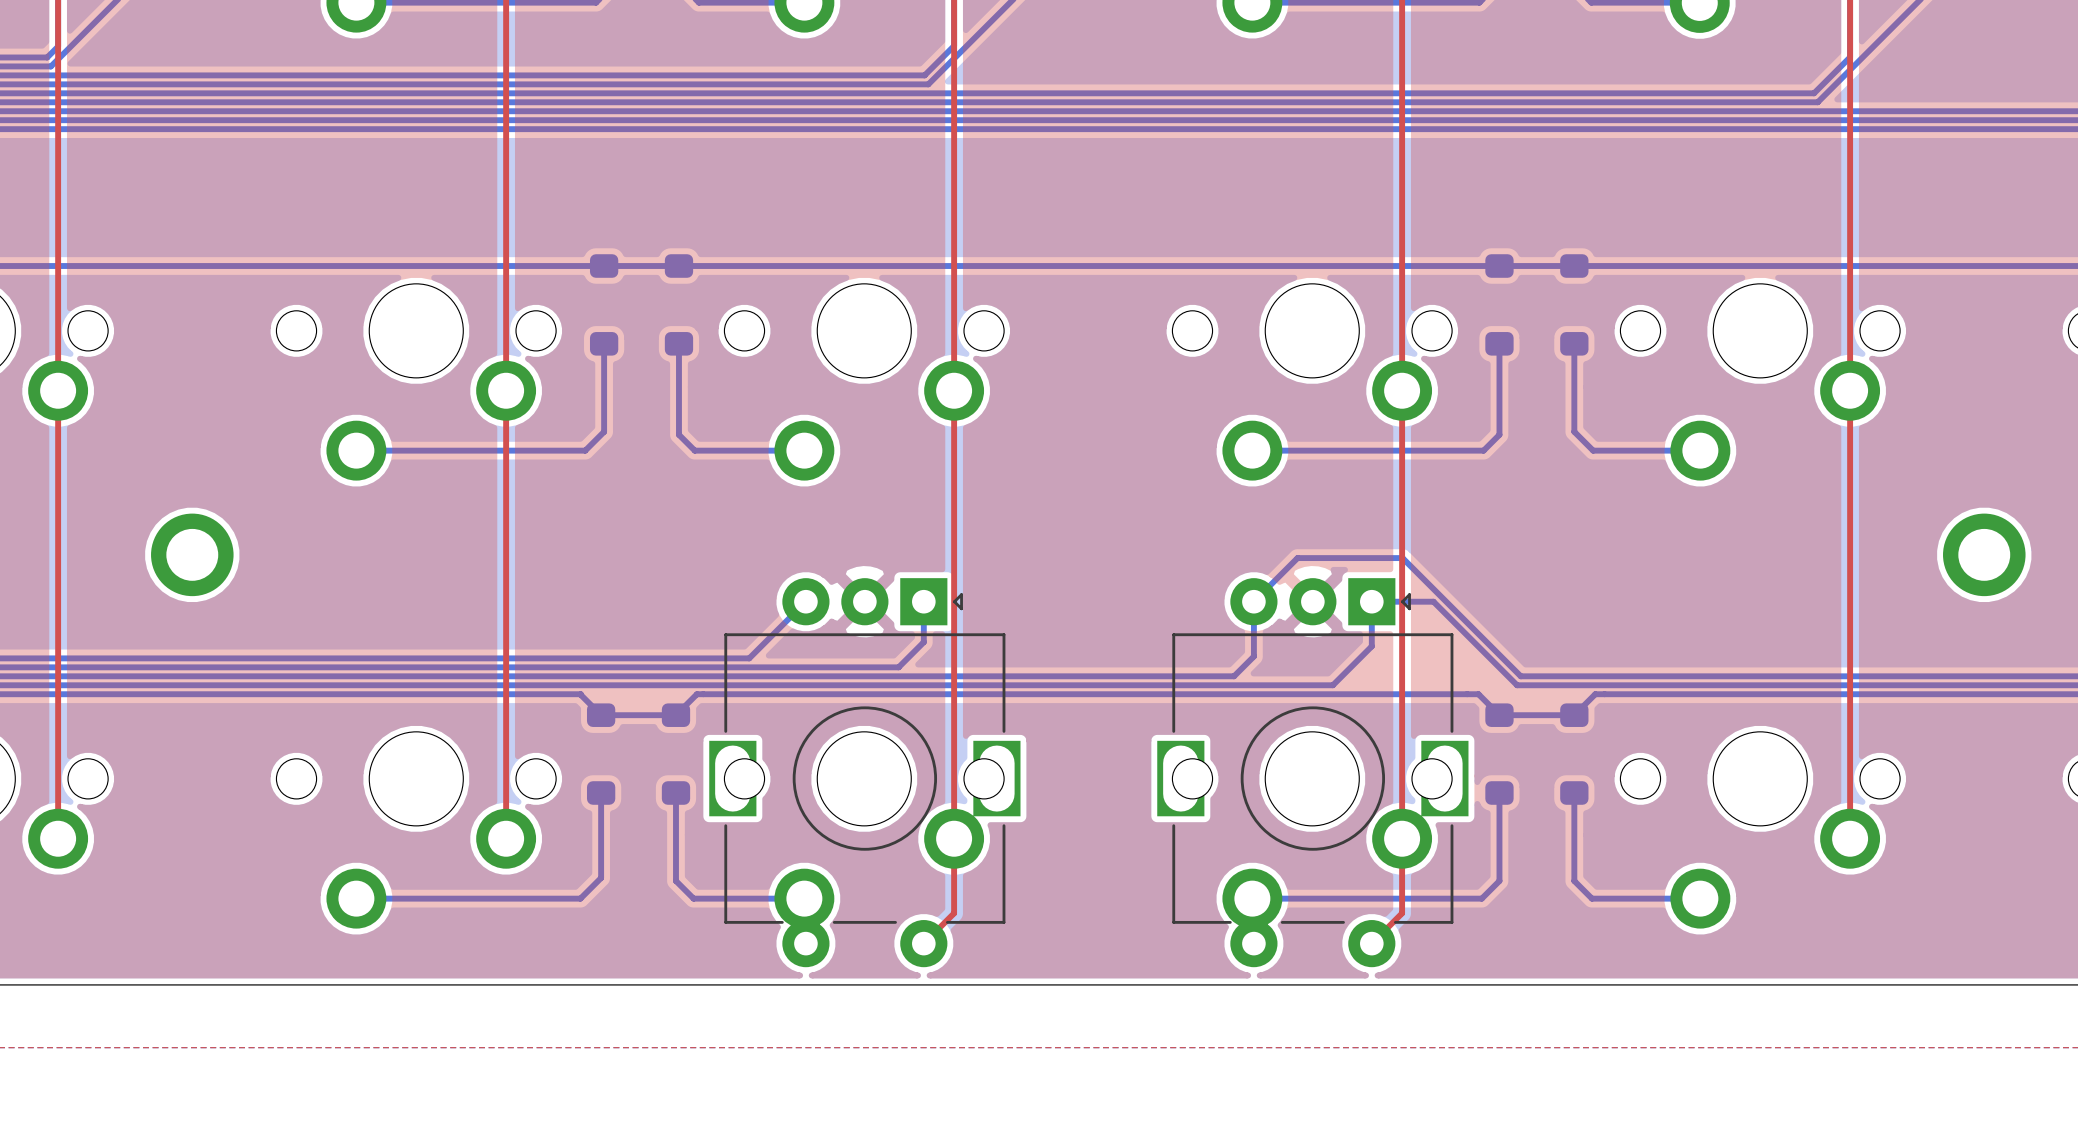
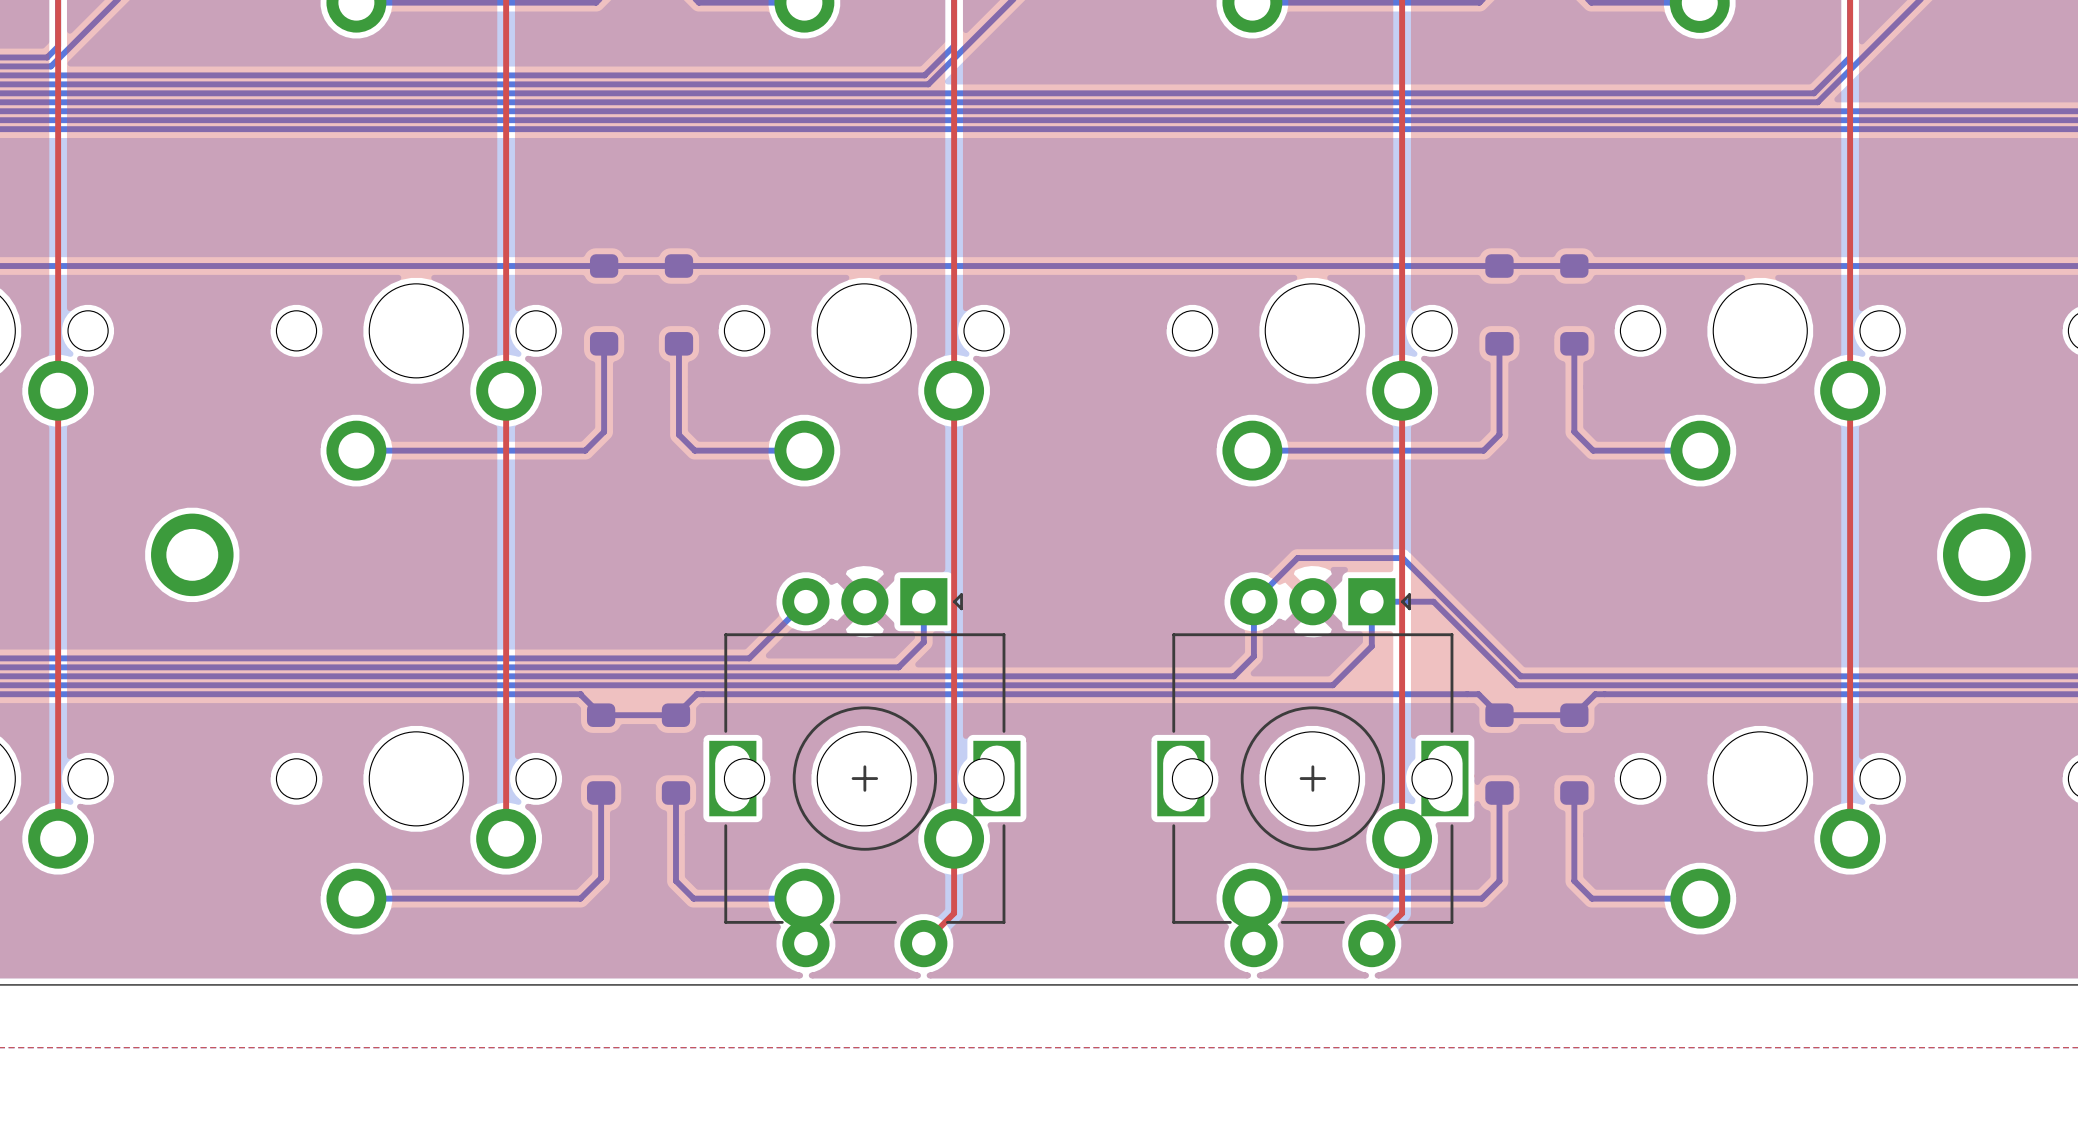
part footprint: [709, 578, 1021, 968] -> [709, 578, 1021, 968]
part footprint: [1157, 578, 1469, 968] -> [1157, 578, 1469, 968]

